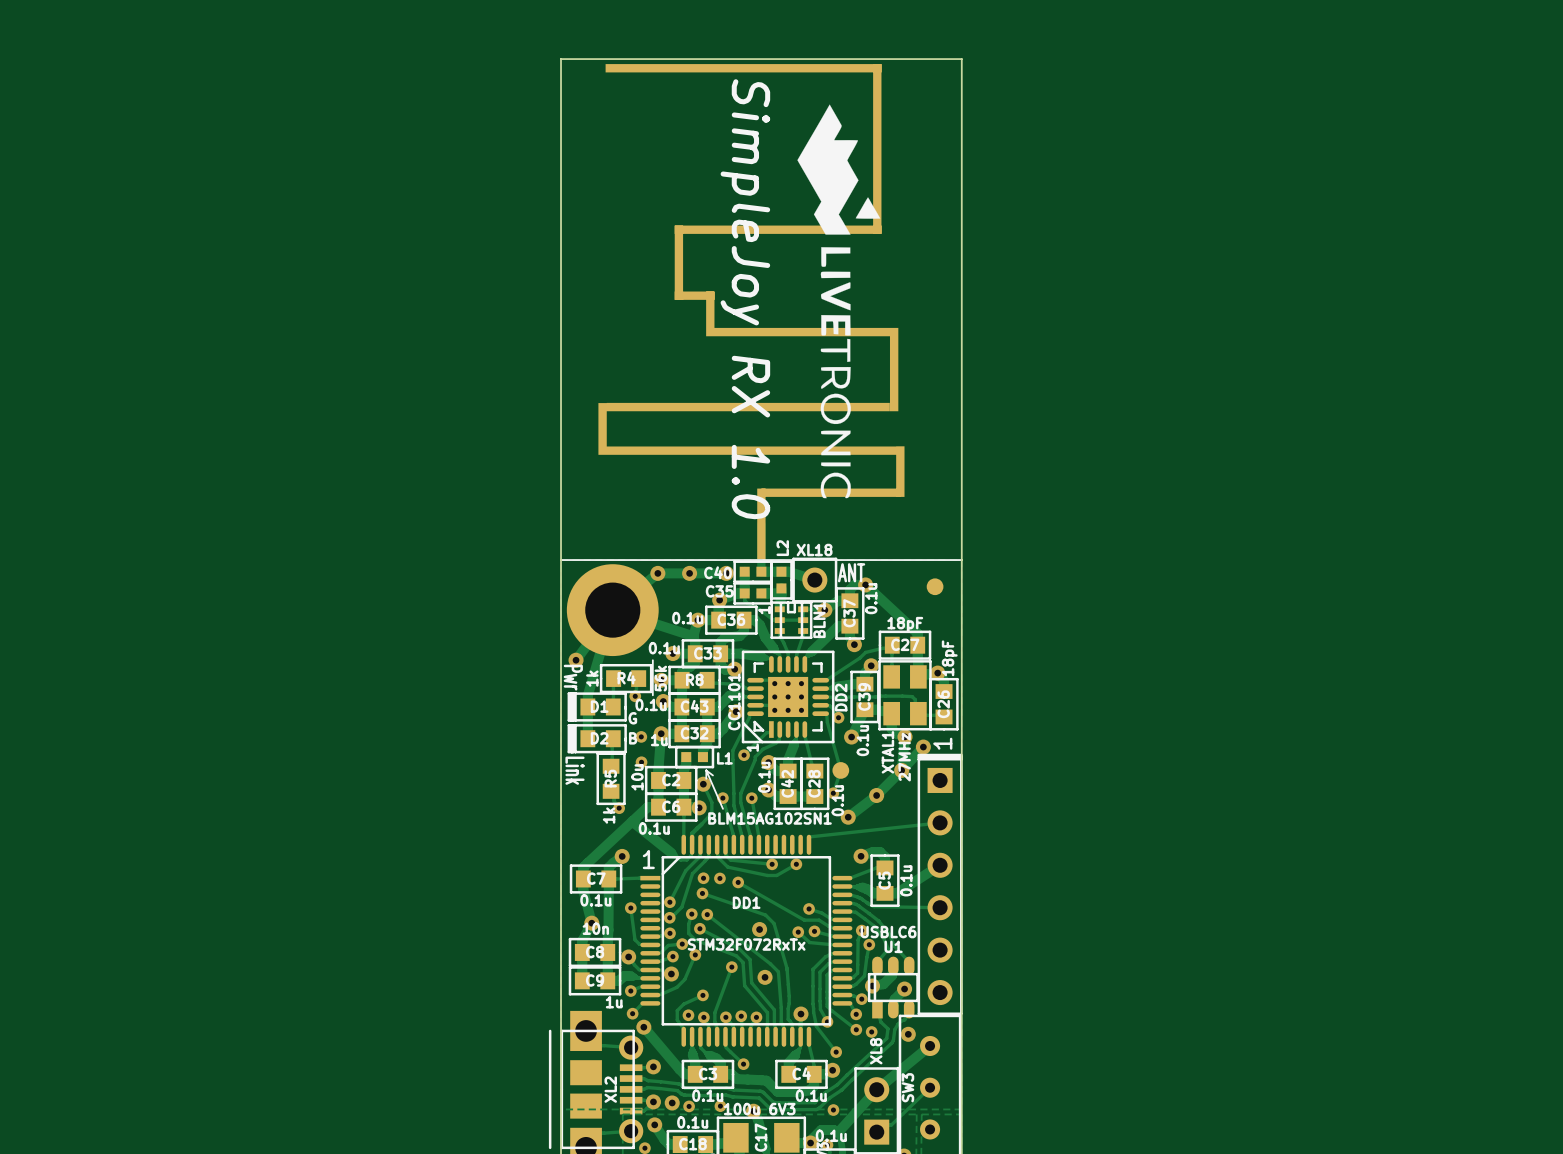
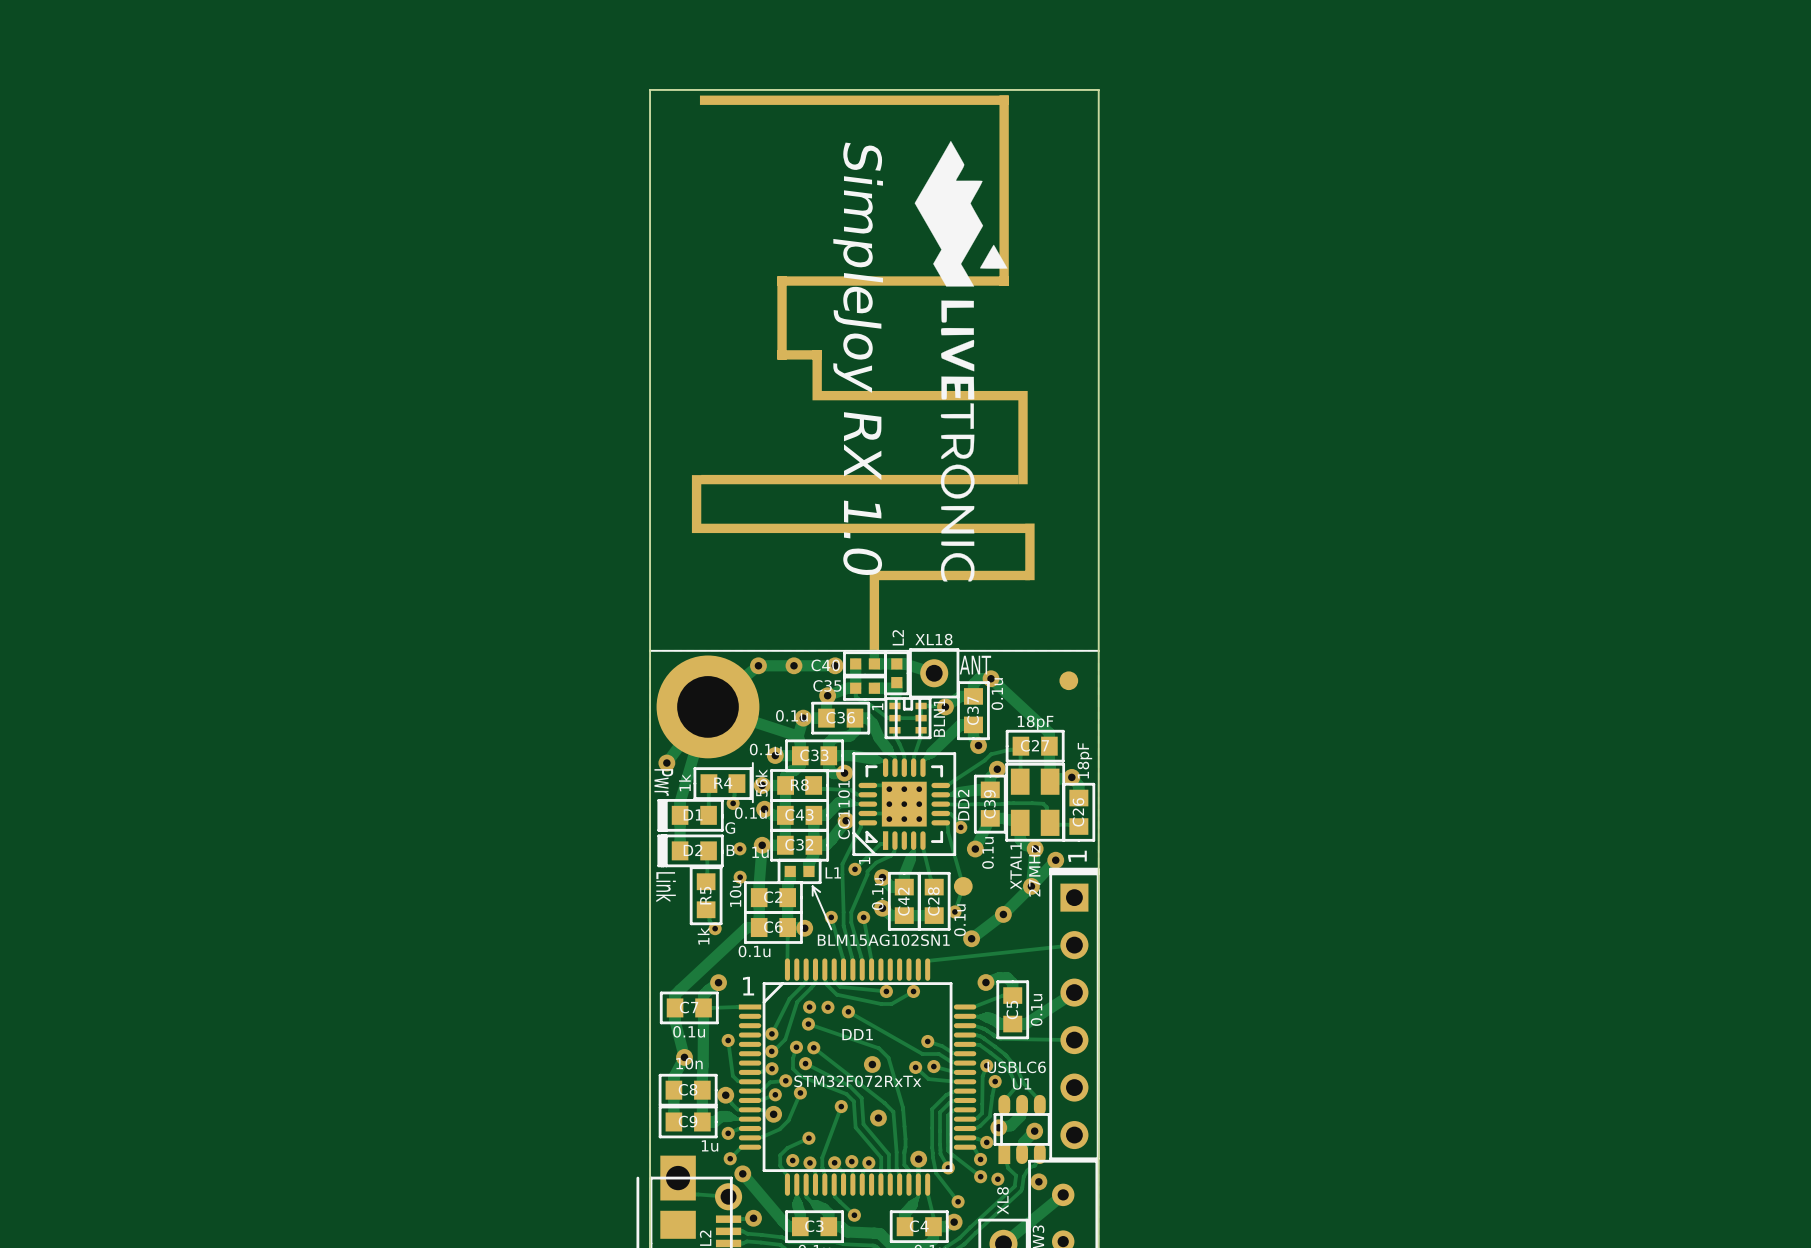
track: (703, 784) (711, 802) (711, 813) (692, 833) (692, 852) (686, 859) (680, 859) (632, 821) -> none
via: (703, 784) -> none

